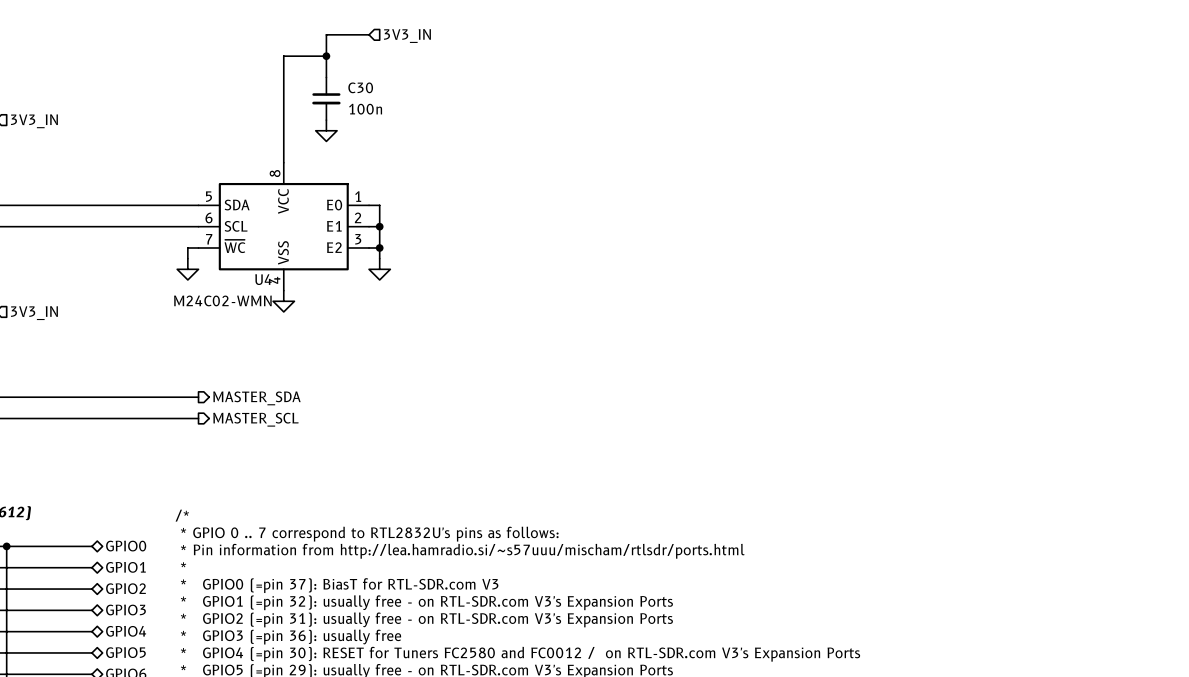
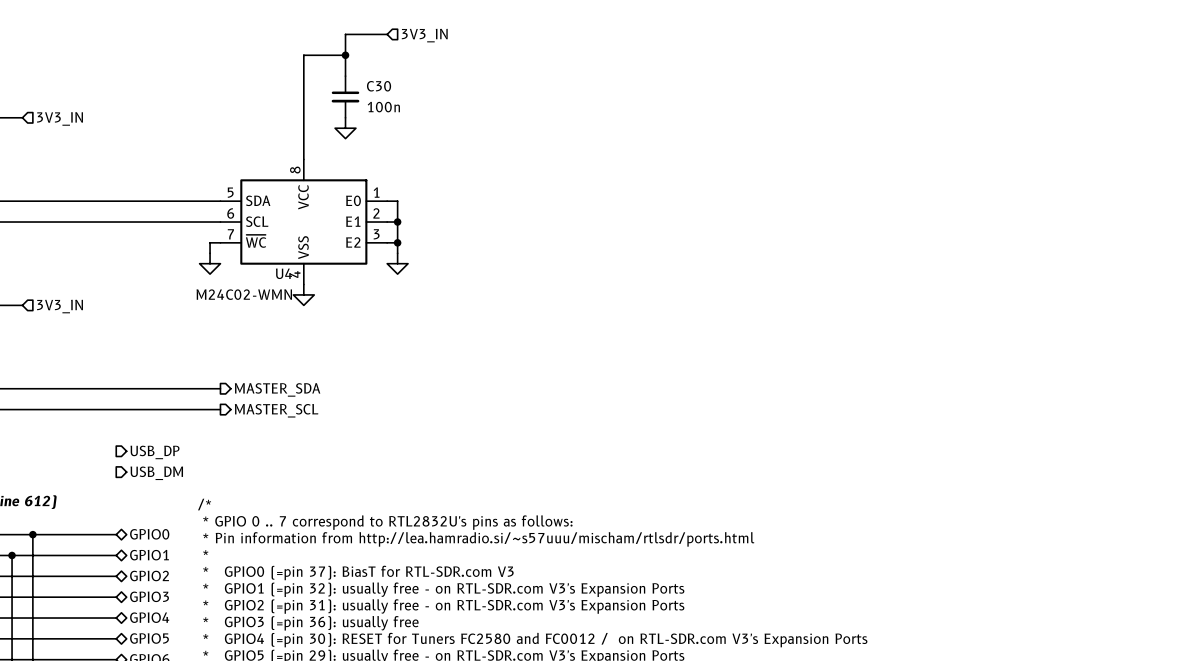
hierarchical label: none -> USB_DP (154, 452)
hierarchical label: none -> USB_DM (156, 473)

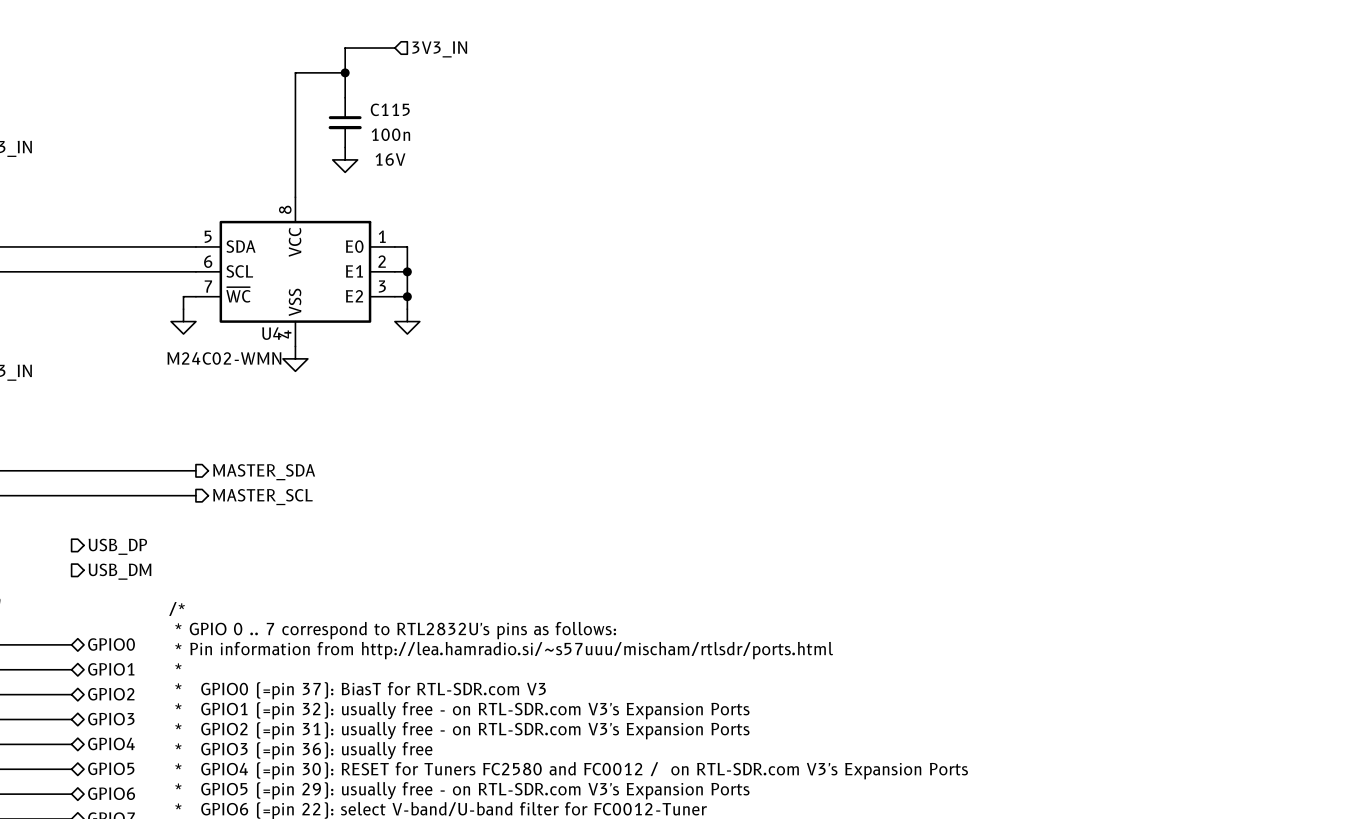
C30 name: C30 (379, 86) -> C115 (390, 109)
C30 text: none -> 16V (390, 159)

